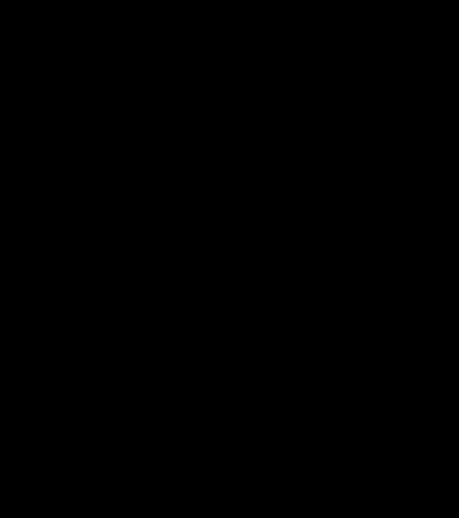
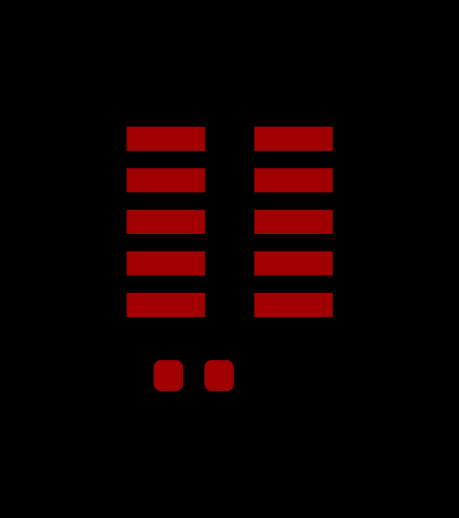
part: none -> (229, 221)
part: none -> (193, 375)

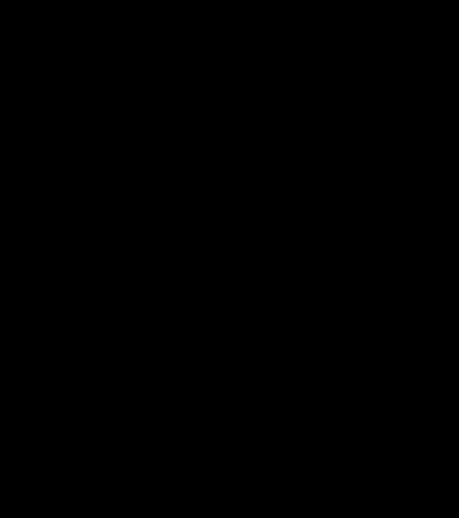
part: (229, 221) -> none
part: (193, 375) -> none

